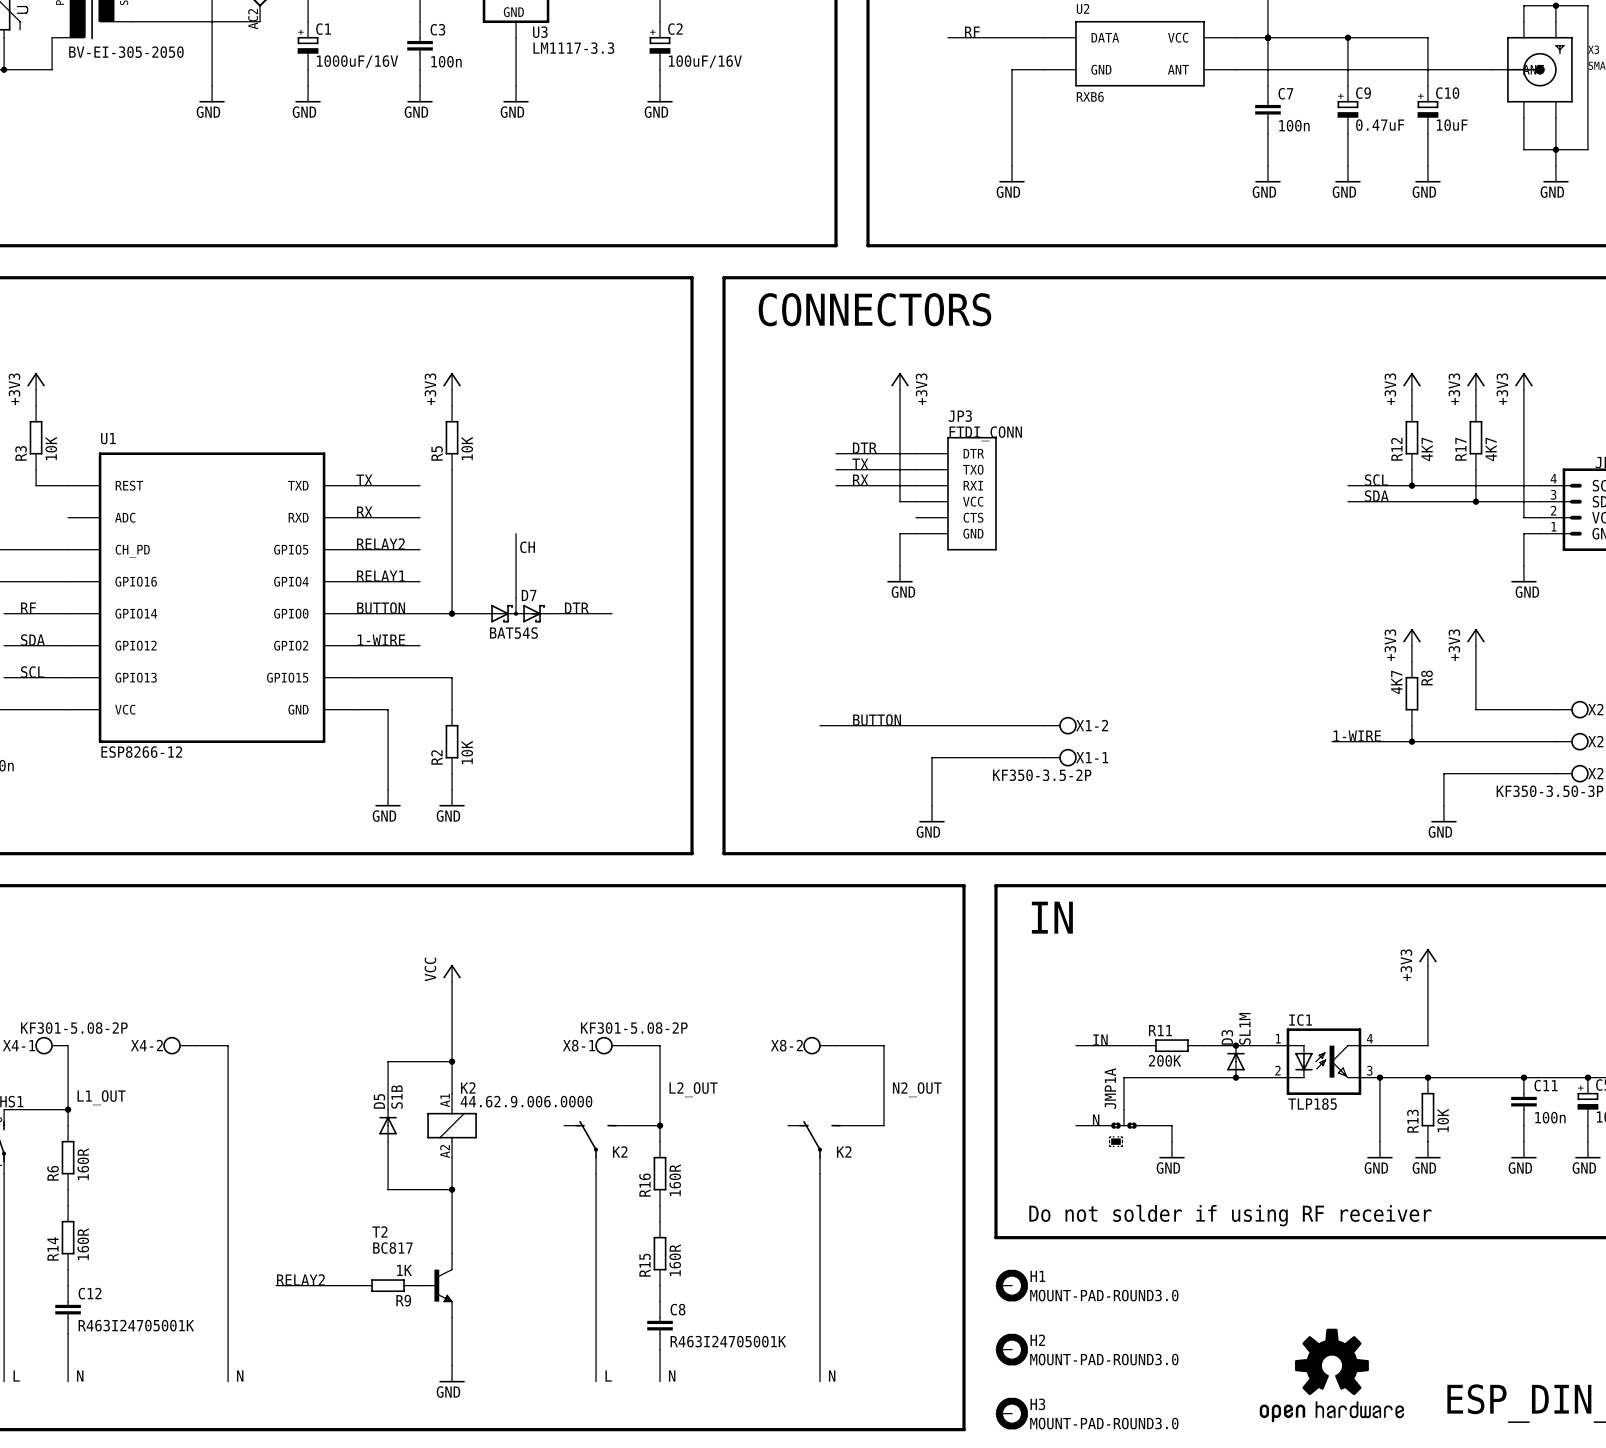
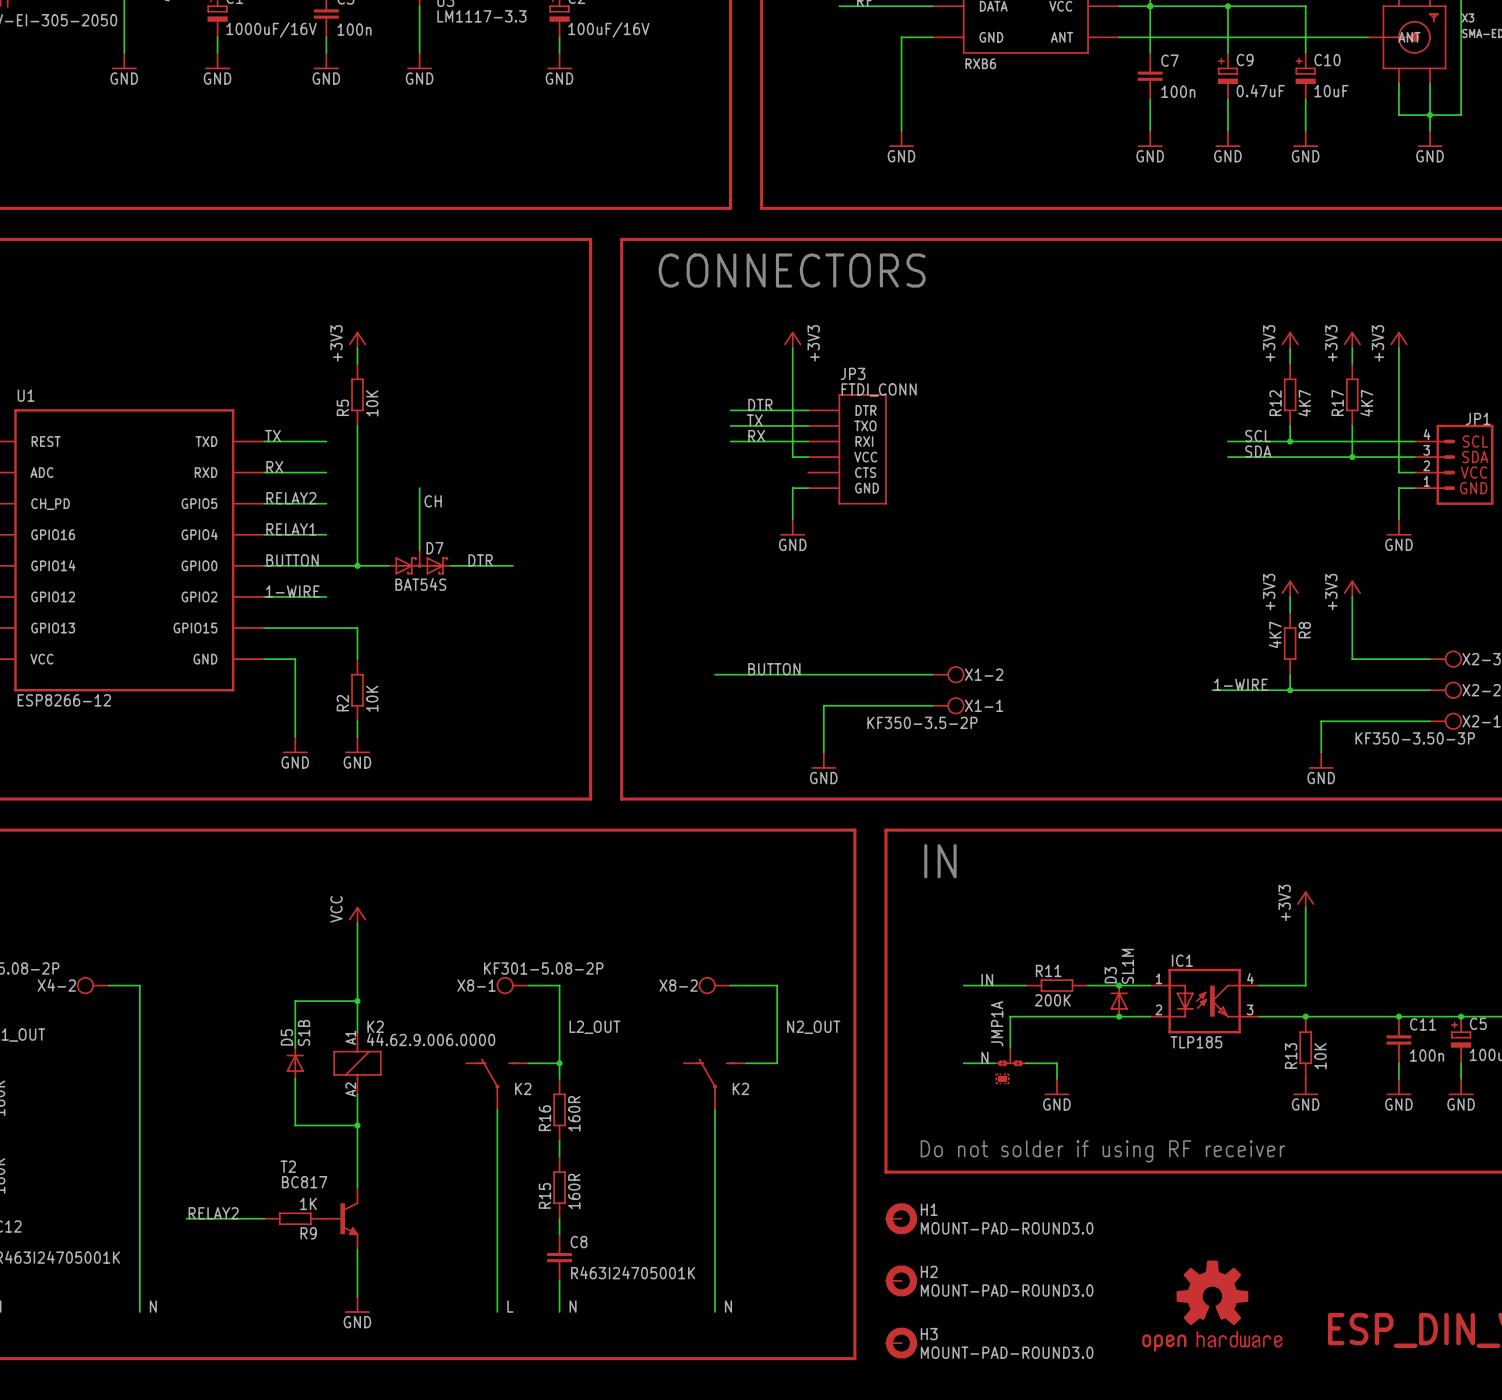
wire: (1379, 1077) (1379, 1141) -> none
junction: (1379, 1077) -> none
power symbol: GND (1379, 1150) -> none

